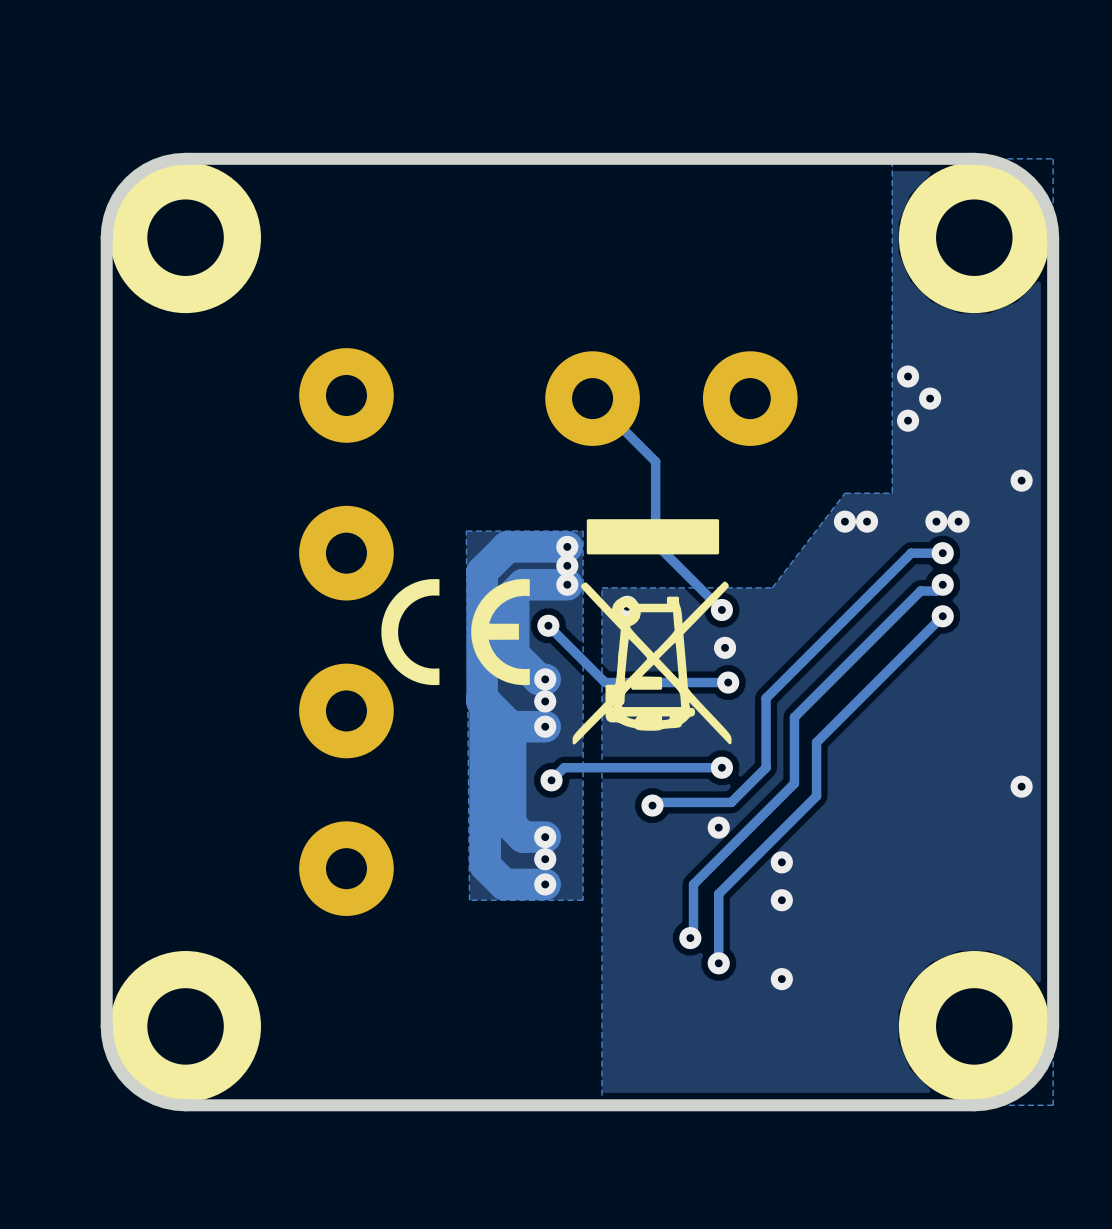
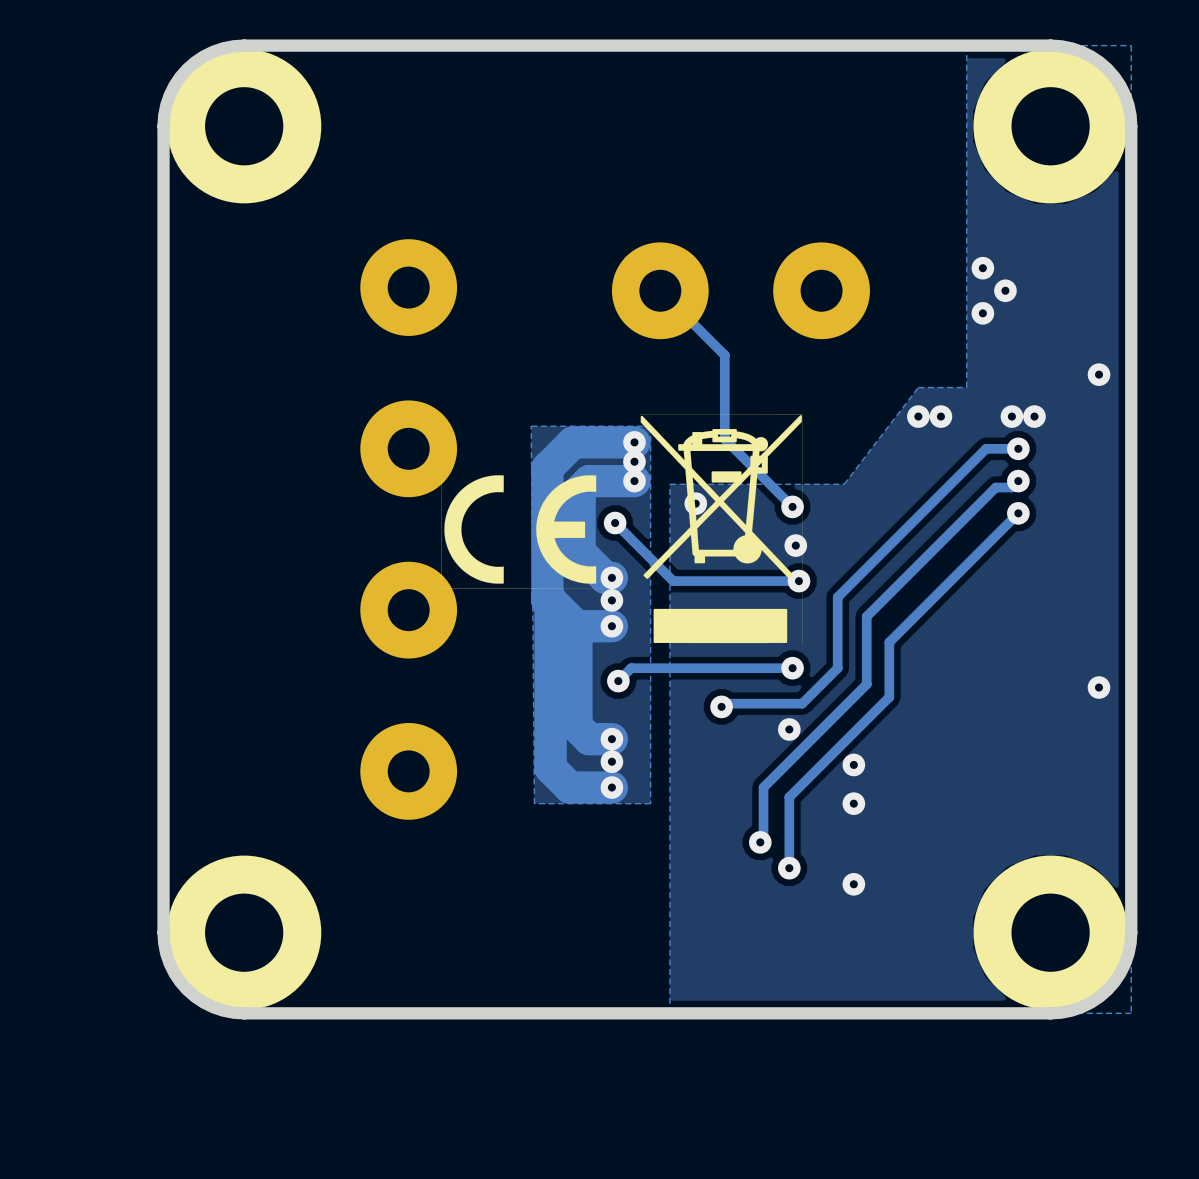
drawing shape: [572, 519, 732, 745] -> [640, 414, 803, 645]
drawing shape: [381, 578, 530, 686] -> [441, 470, 603, 589]

